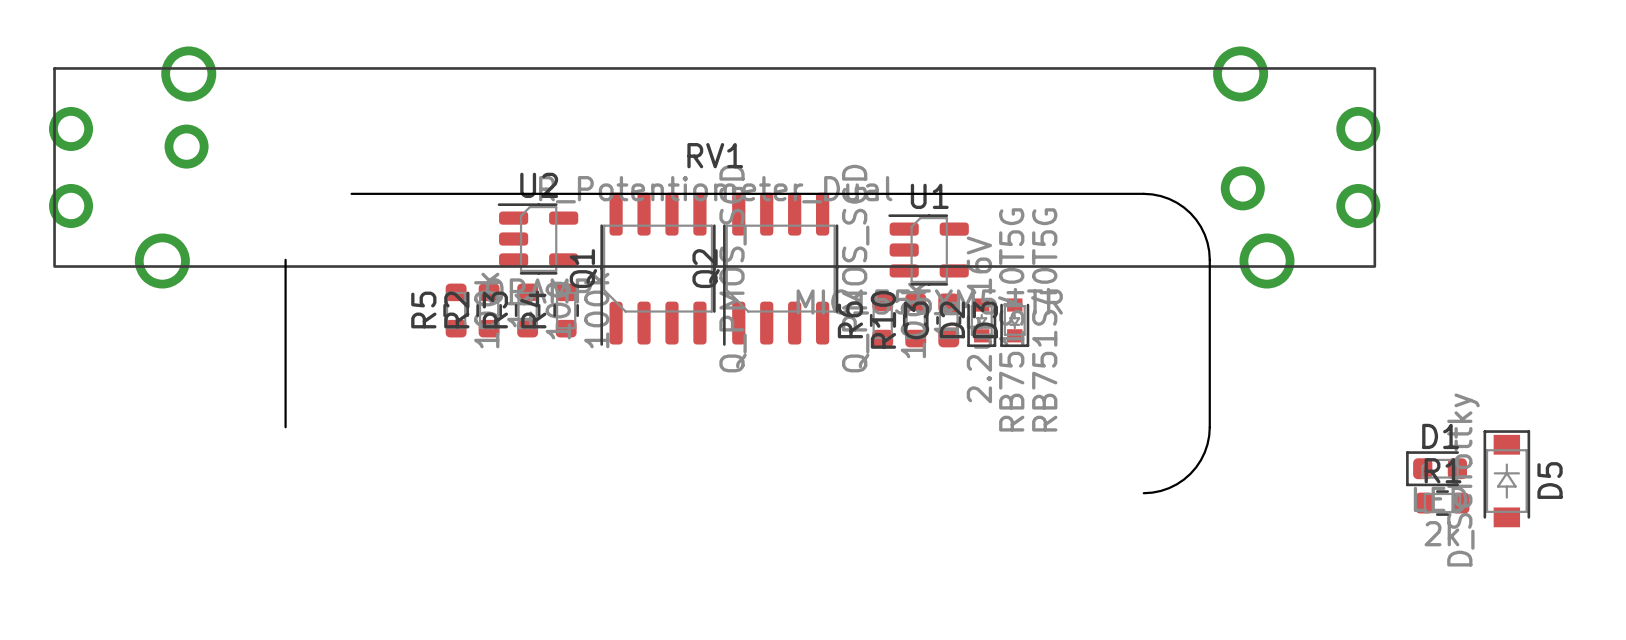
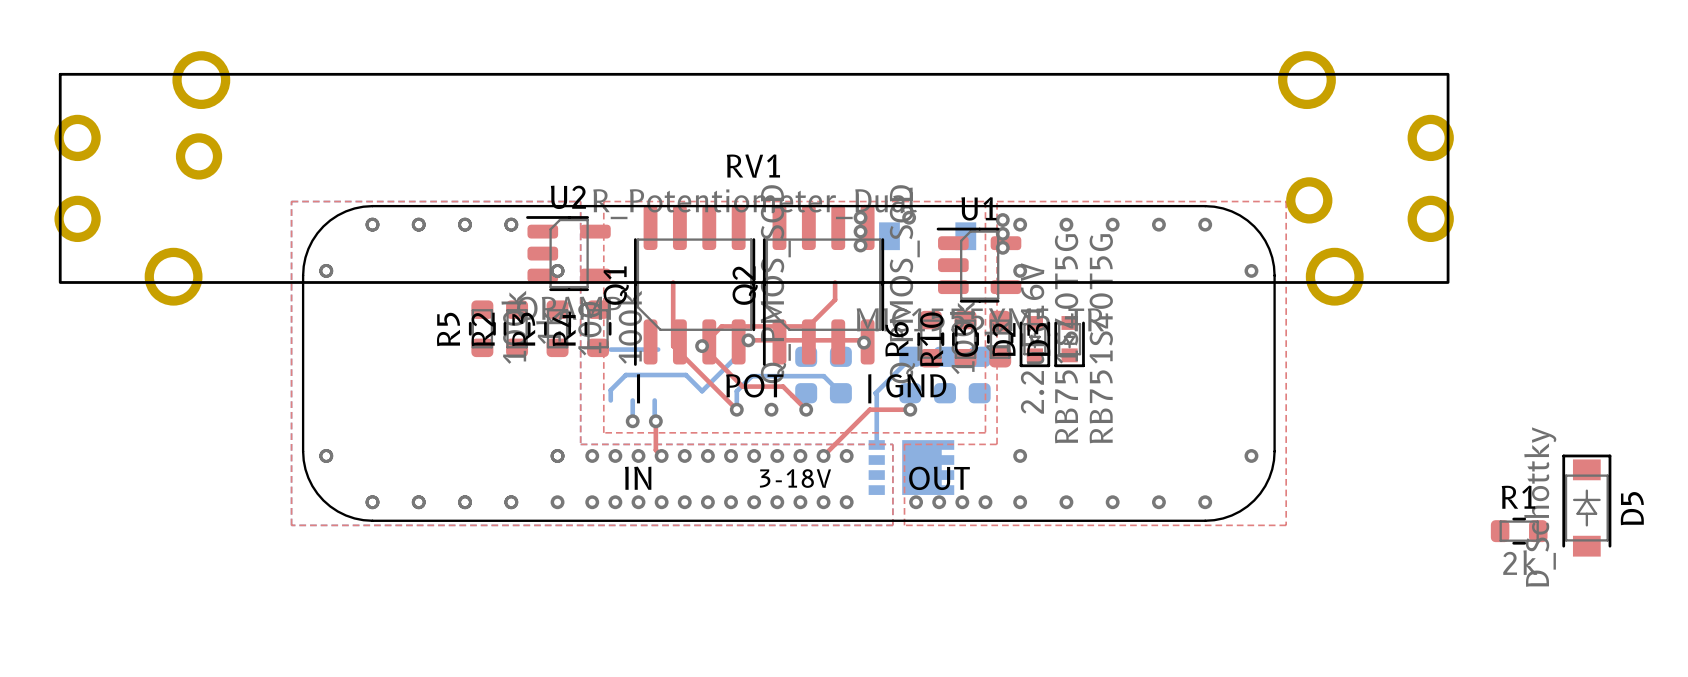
top zone outline: none -> (291, 201) (291, 525) (892, 525) (892, 444) (580, 444) (580, 201) (291, 201)
top zone outline: none -> (603, 201) (985, 201) (985, 432) (603, 432) (603, 201)
top zone outline: none -> (997, 201) (1286, 201) (1286, 525) (904, 525) (904, 444) (997, 444) (997, 201)
board edge: none -> (372, 206) (345, 211) (323, 226) (308, 248) (303, 275)
via: none -> (860, 217)
via: none -> (909, 217)
via: none -> (1002, 220)
via: none -> (372, 224)
via: none -> (418, 224)
via: none -> (465, 224)
via: none -> (511, 224)
via: none -> (1020, 224)
via: none -> (1066, 224)
via: none -> (1112, 224)
via: none -> (1158, 224)
via: none -> (1205, 224)
via: none -> (860, 231)
via: none -> (1002, 233)
part: none -> (927, 236)
via: none -> (860, 245)
via: none -> (1002, 247)
via: none -> (326, 270)
via: none -> (557, 270)
via: none -> (1020, 270)
via: none -> (1251, 270)
top track: none -> (673, 282) (673, 346) (736, 409)
top track: none -> (835, 282) (835, 299) (808, 326) (721, 326) (702, 346) (742, 386) (783, 386) (806, 409)
bottom track: none -> (748, 340) (736, 351) (736, 358) (734, 358) (702, 391) (685, 375) (625, 375) (610, 390) (610, 400)
top track: none -> (748, 340) (864, 340) (864, 342)
via: none -> (748, 340)
via: none -> (864, 342)
via: none -> (702, 346)
bottom track: none -> (610, 349) (658, 349)
bottom track: none -> (910, 356) (875, 393) (876, 444)
part: none -> (806, 375)
part: none -> (840, 375)
part: none -> (910, 375)
part: none -> (944, 375)
text: none -> POT (754, 385)
text: none -> GND (916, 385)
text: none -> | (638, 388)
text: none -> | (869, 388)
bottom track: none -> (840, 393) (823, 376) (751, 376) (736, 391) (736, 409)
bottom track: none -> (632, 400) (632, 421)
bottom track: none -> (654, 400) (655, 421)
via: none -> (736, 409)
via: none -> (771, 409)
via: none -> (806, 409)
top track: none -> (910, 409) (869, 409) (823, 455)
via: none -> (910, 409)
via: none -> (632, 421)
top track: none -> (655, 421) (655, 450) (661, 455)
via: none -> (655, 421)
board edge: none -> (303, 451) (305, 469) (317, 493) (337, 511) (363, 520) (1205, 520)
via: none -> (326, 455)
via: none -> (557, 455)
via: none -> (592, 455)
via: none -> (615, 455)
via: none -> (638, 455)
via: none -> (661, 455)
via: none -> (684, 455)
via: none -> (707, 455)
via: none -> (731, 455)
via: none -> (754, 455)
via: none -> (777, 455)
via: none -> (800, 455)
via: none -> (823, 455)
via: none -> (846, 455)
via: none -> (1020, 455)
via: none -> (1251, 455)
part: none -> (911, 467)
text: none -> IN (638, 478)
text: none -> 3-18V (795, 478)
text: none -> OUT (939, 478)
D1 side: top (1436, 468) -> bottom (979, 375)
via: none -> (372, 502)
via: none -> (418, 502)
via: none -> (465, 502)
via: none -> (511, 502)
via: none -> (557, 502)
via: none -> (592, 502)
via: none -> (615, 502)
via: none -> (638, 502)
via: none -> (661, 502)
via: none -> (684, 502)
via: none -> (707, 502)
via: none -> (731, 502)
via: none -> (754, 502)
via: none -> (777, 502)
via: none -> (800, 502)
via: none -> (823, 502)
via: none -> (846, 502)
via: none -> (916, 502)
via: none -> (939, 502)
via: none -> (962, 502)
via: none -> (985, 502)
via: none -> (1020, 502)
via: none -> (1066, 502)
via: none -> (1112, 502)
via: none -> (1158, 502)
via: none -> (1205, 502)

